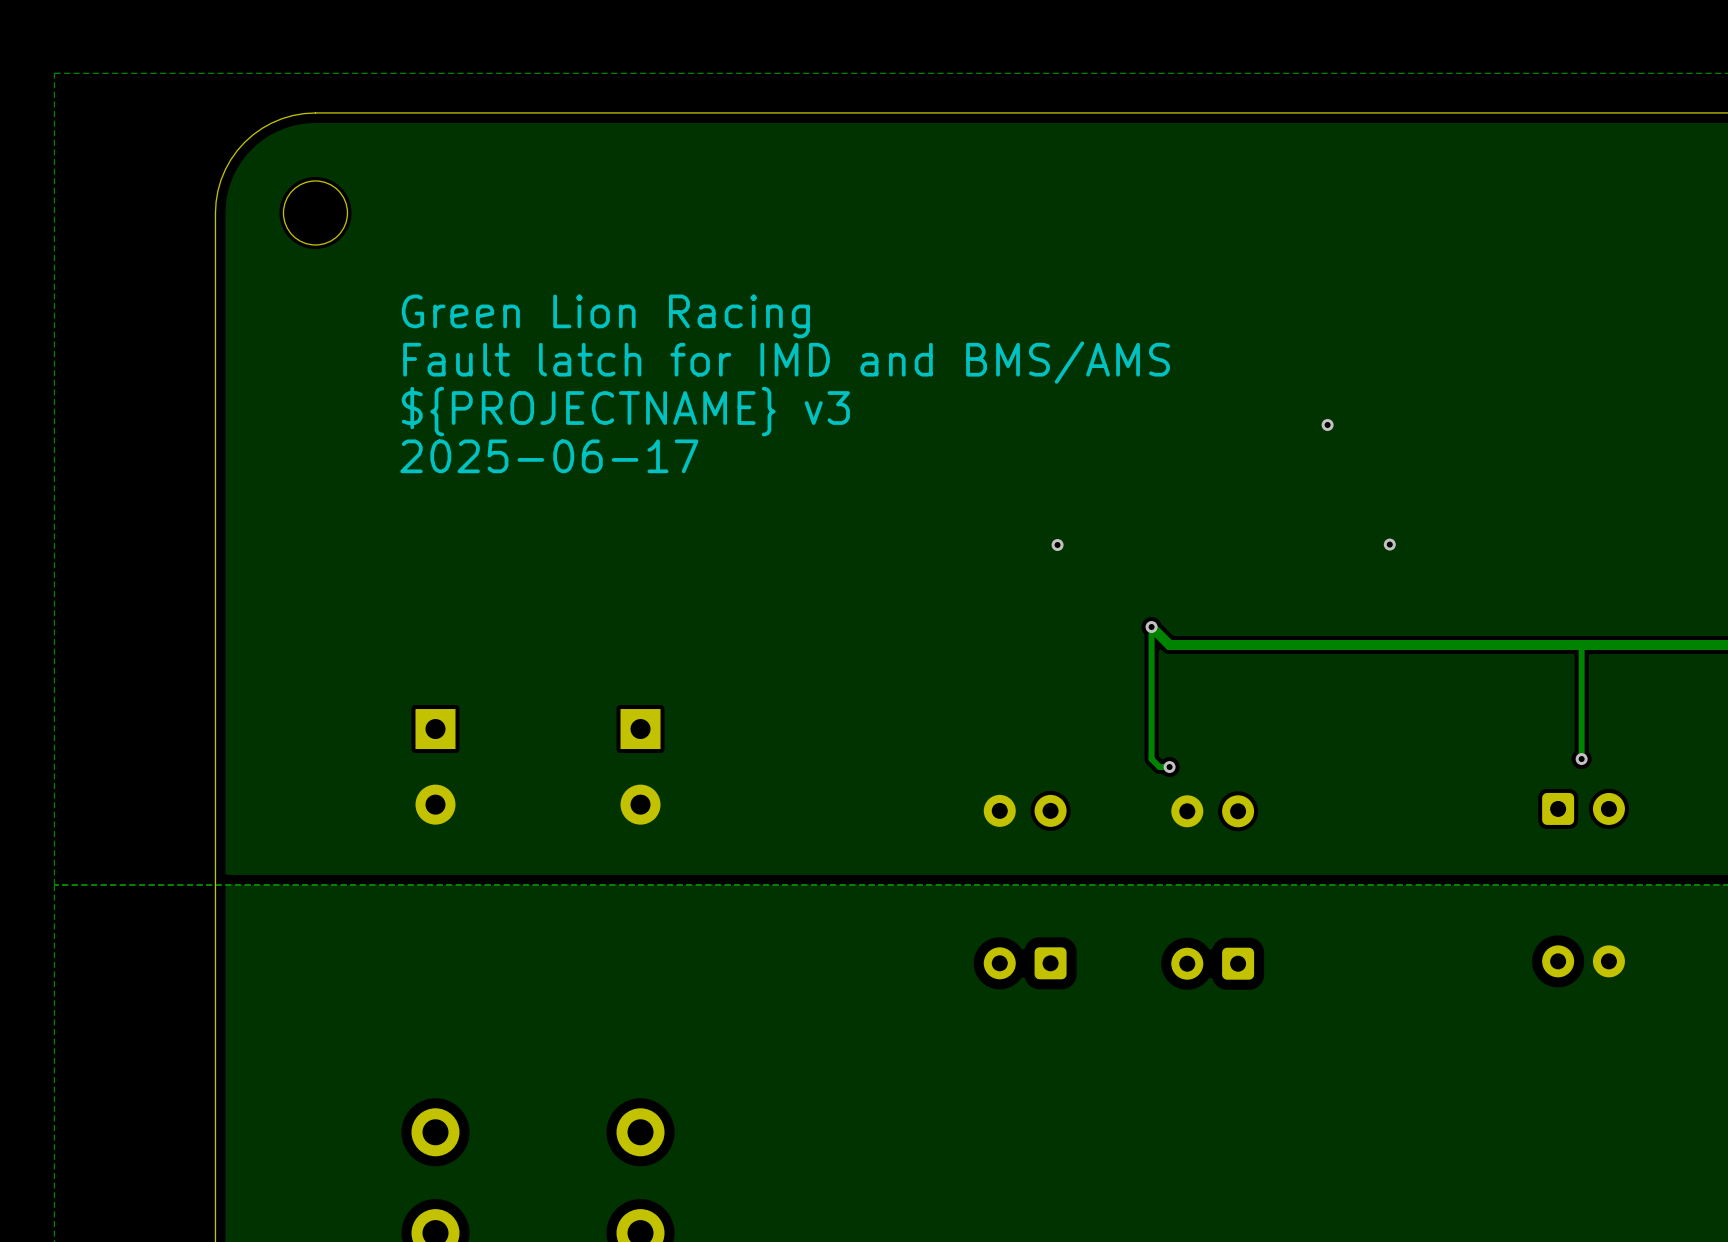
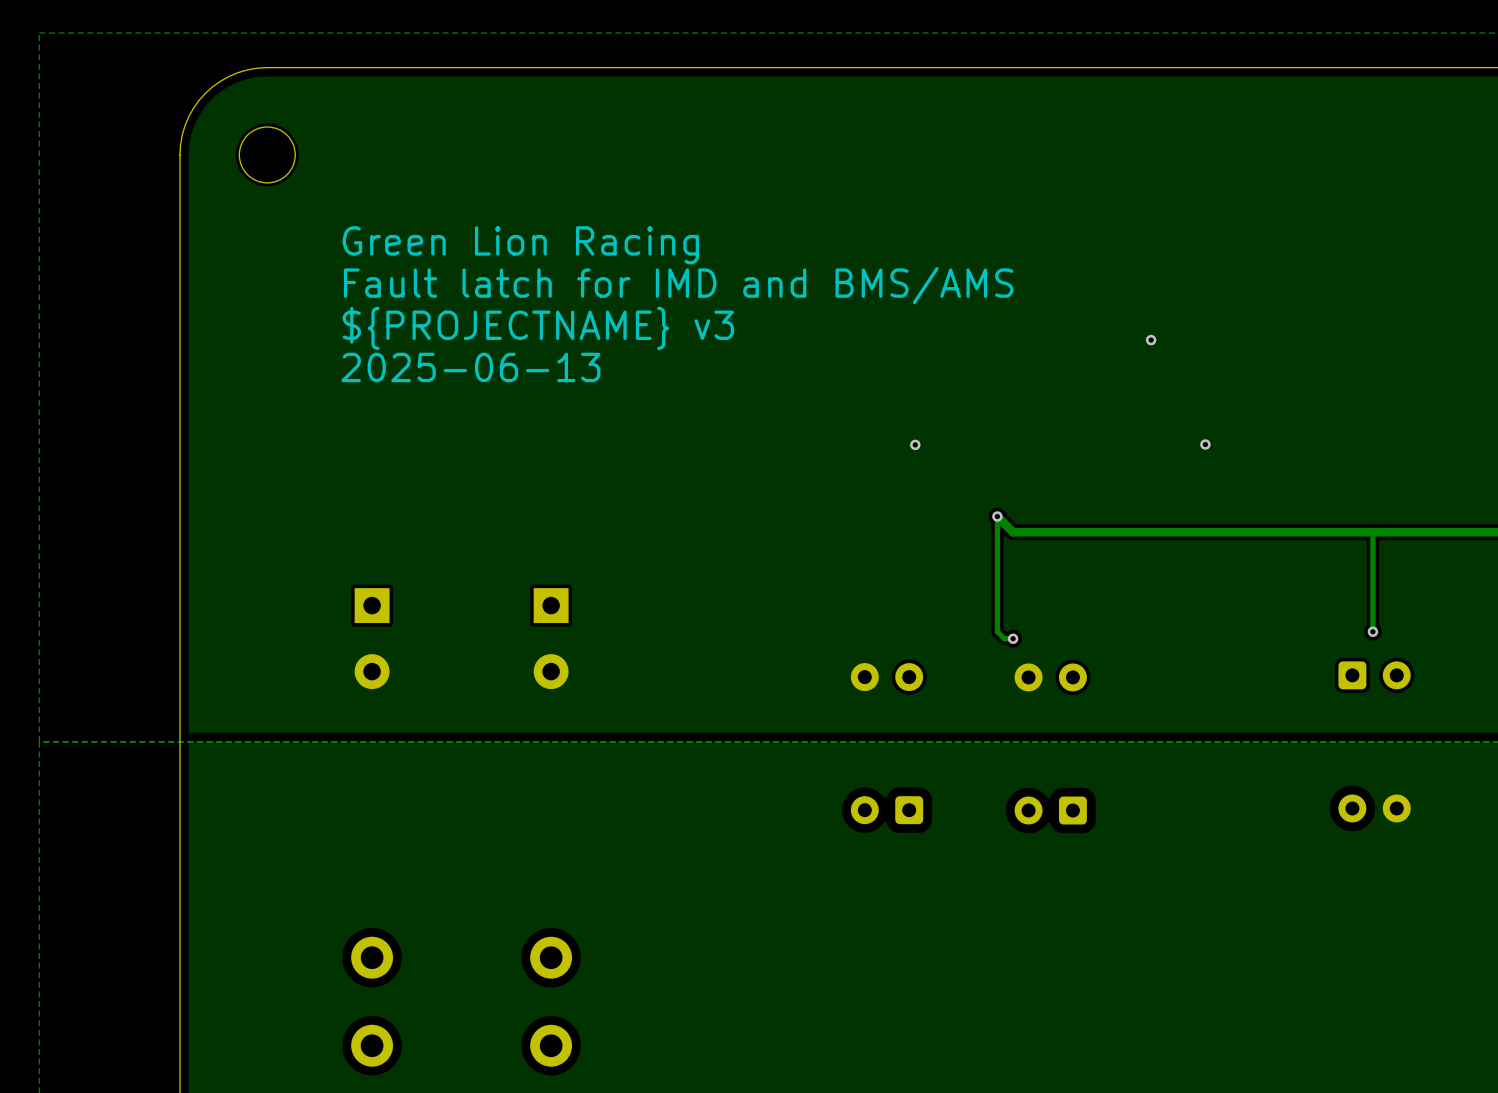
text: 2025-06-17 (549, 456) -> 2025-06-13 (470, 367)

